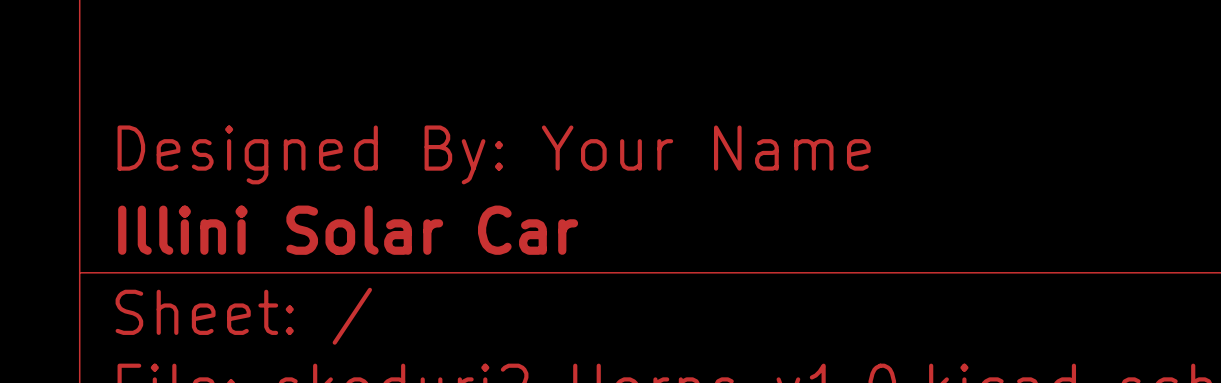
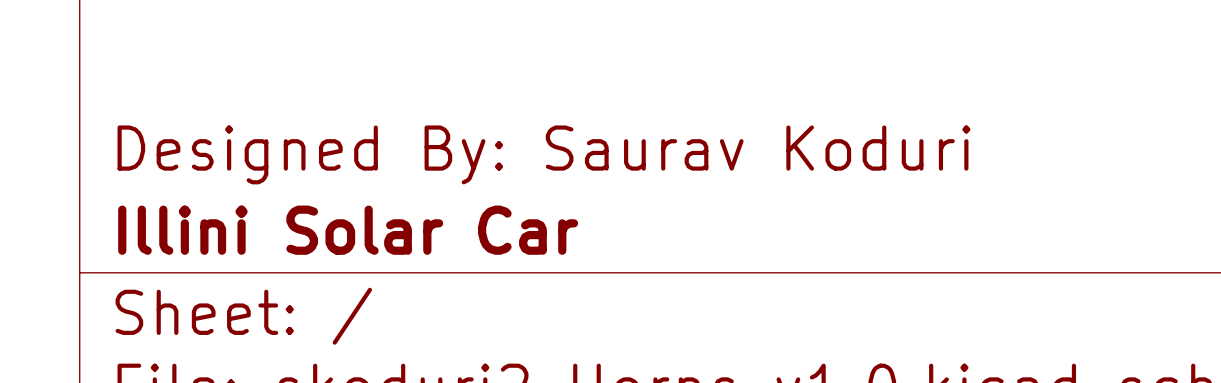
title block: Designed By: Your Name (494, 154) -> Designed By: Saurav Koduri (543, 154)

